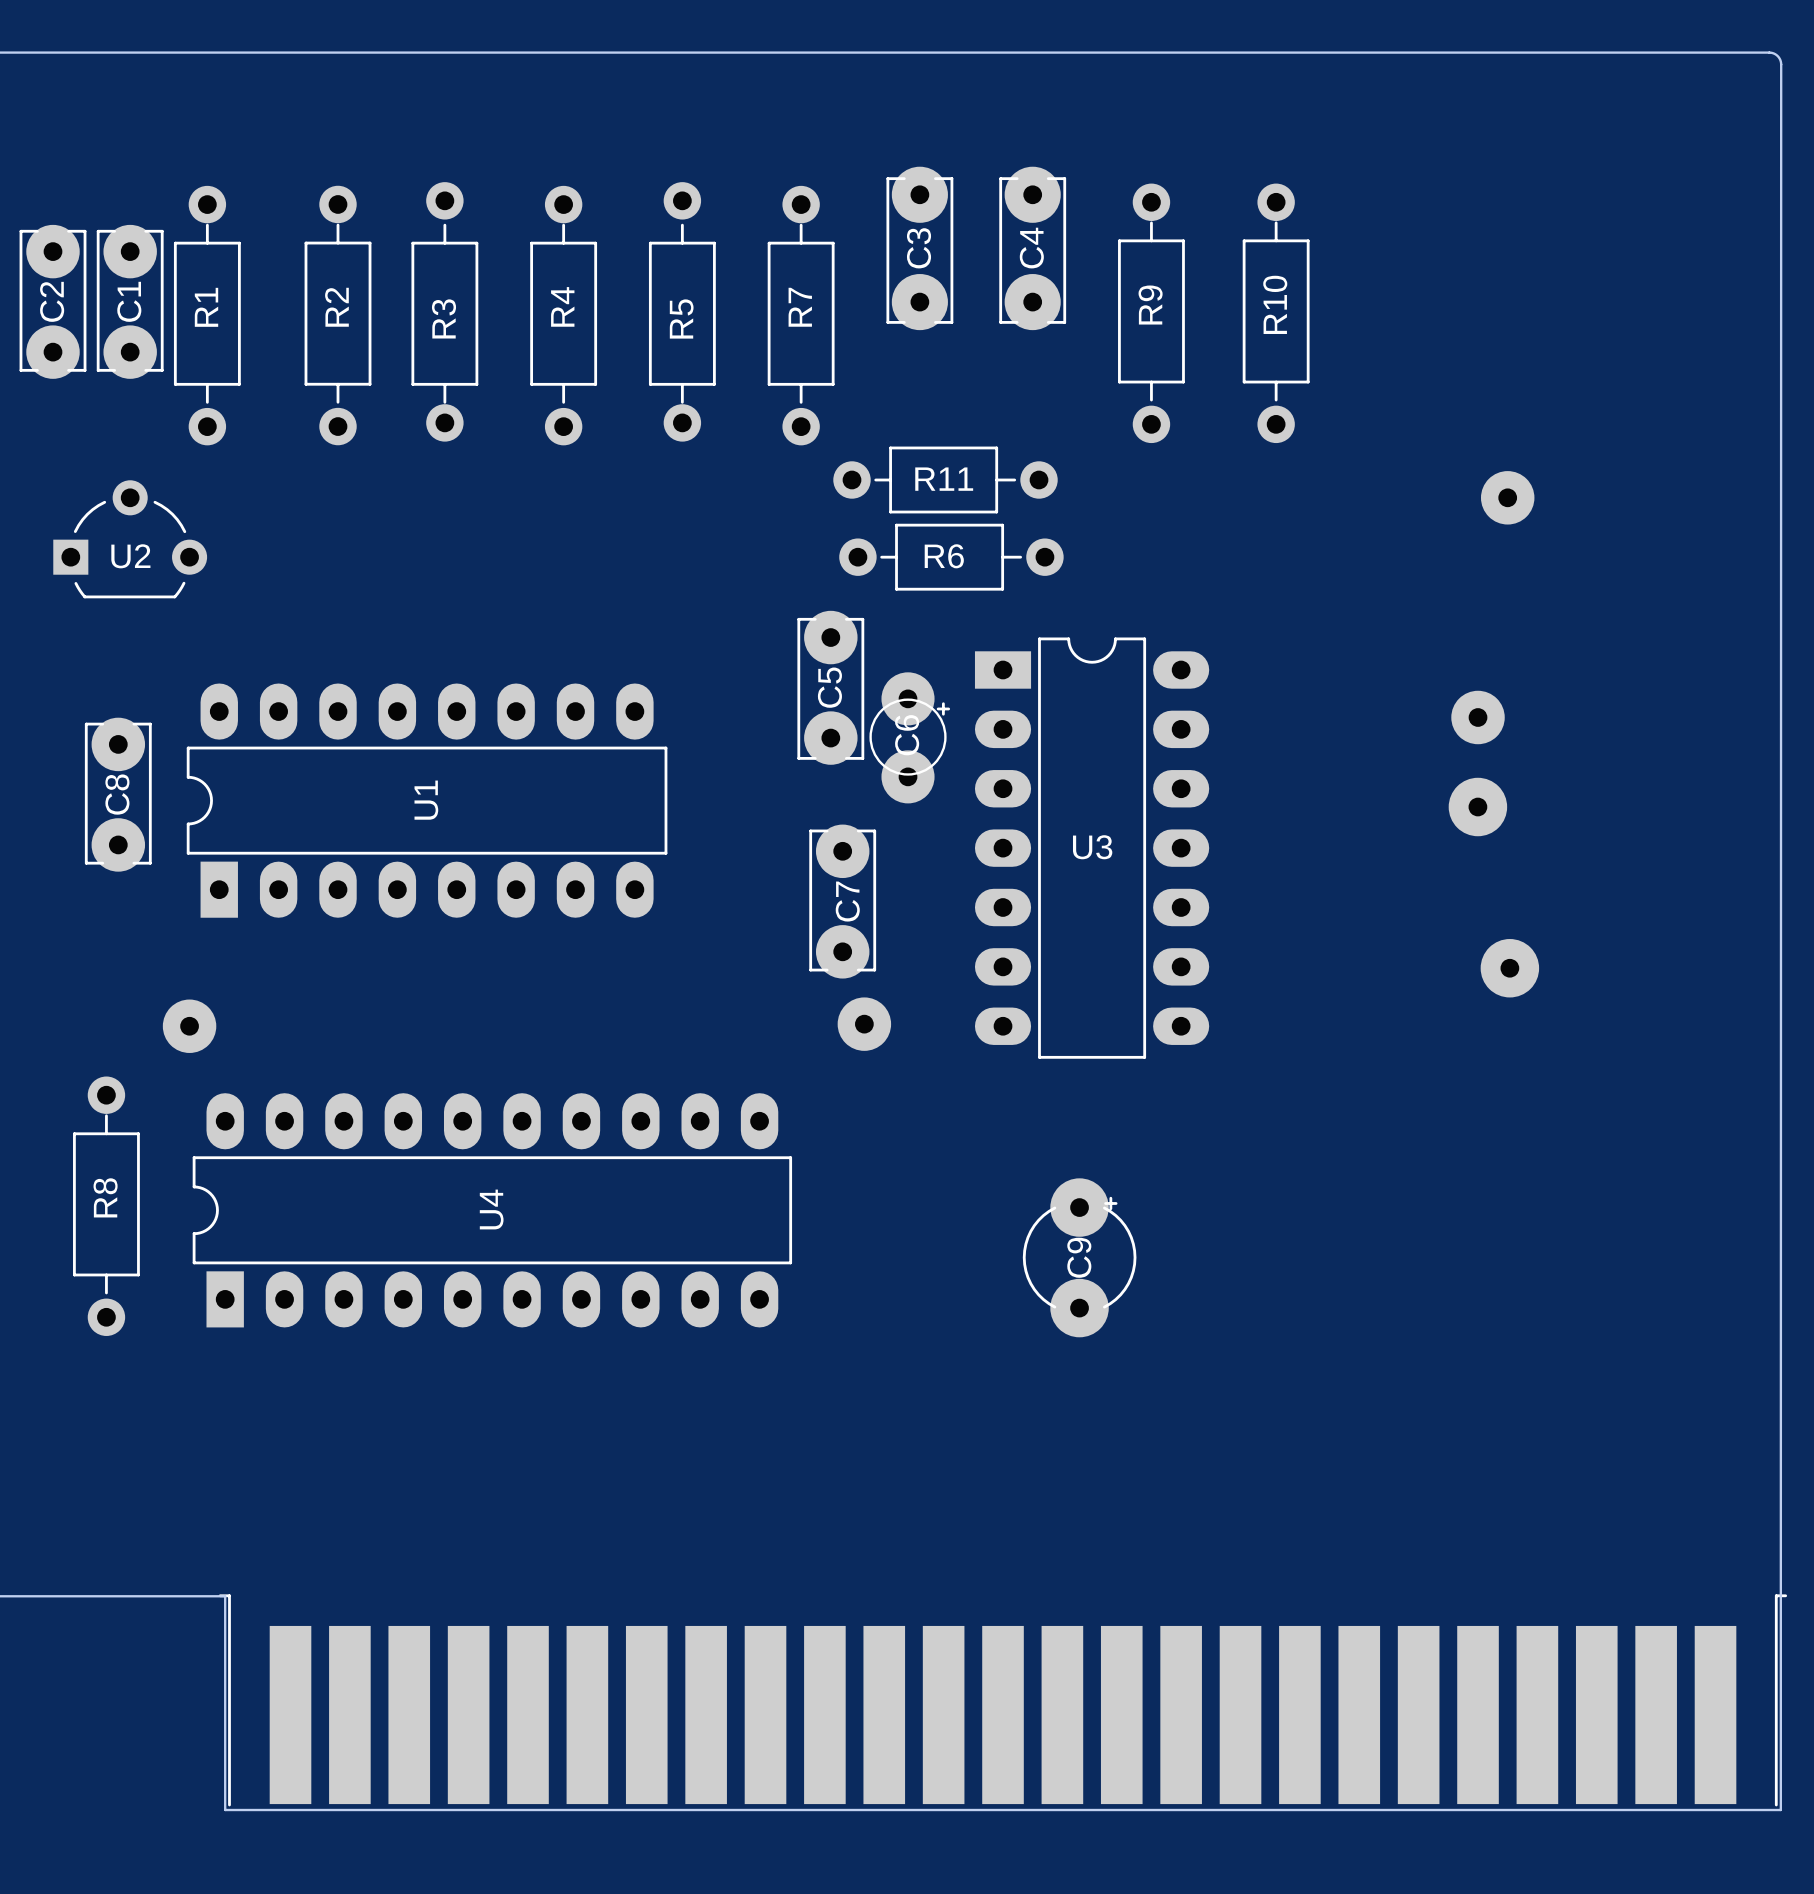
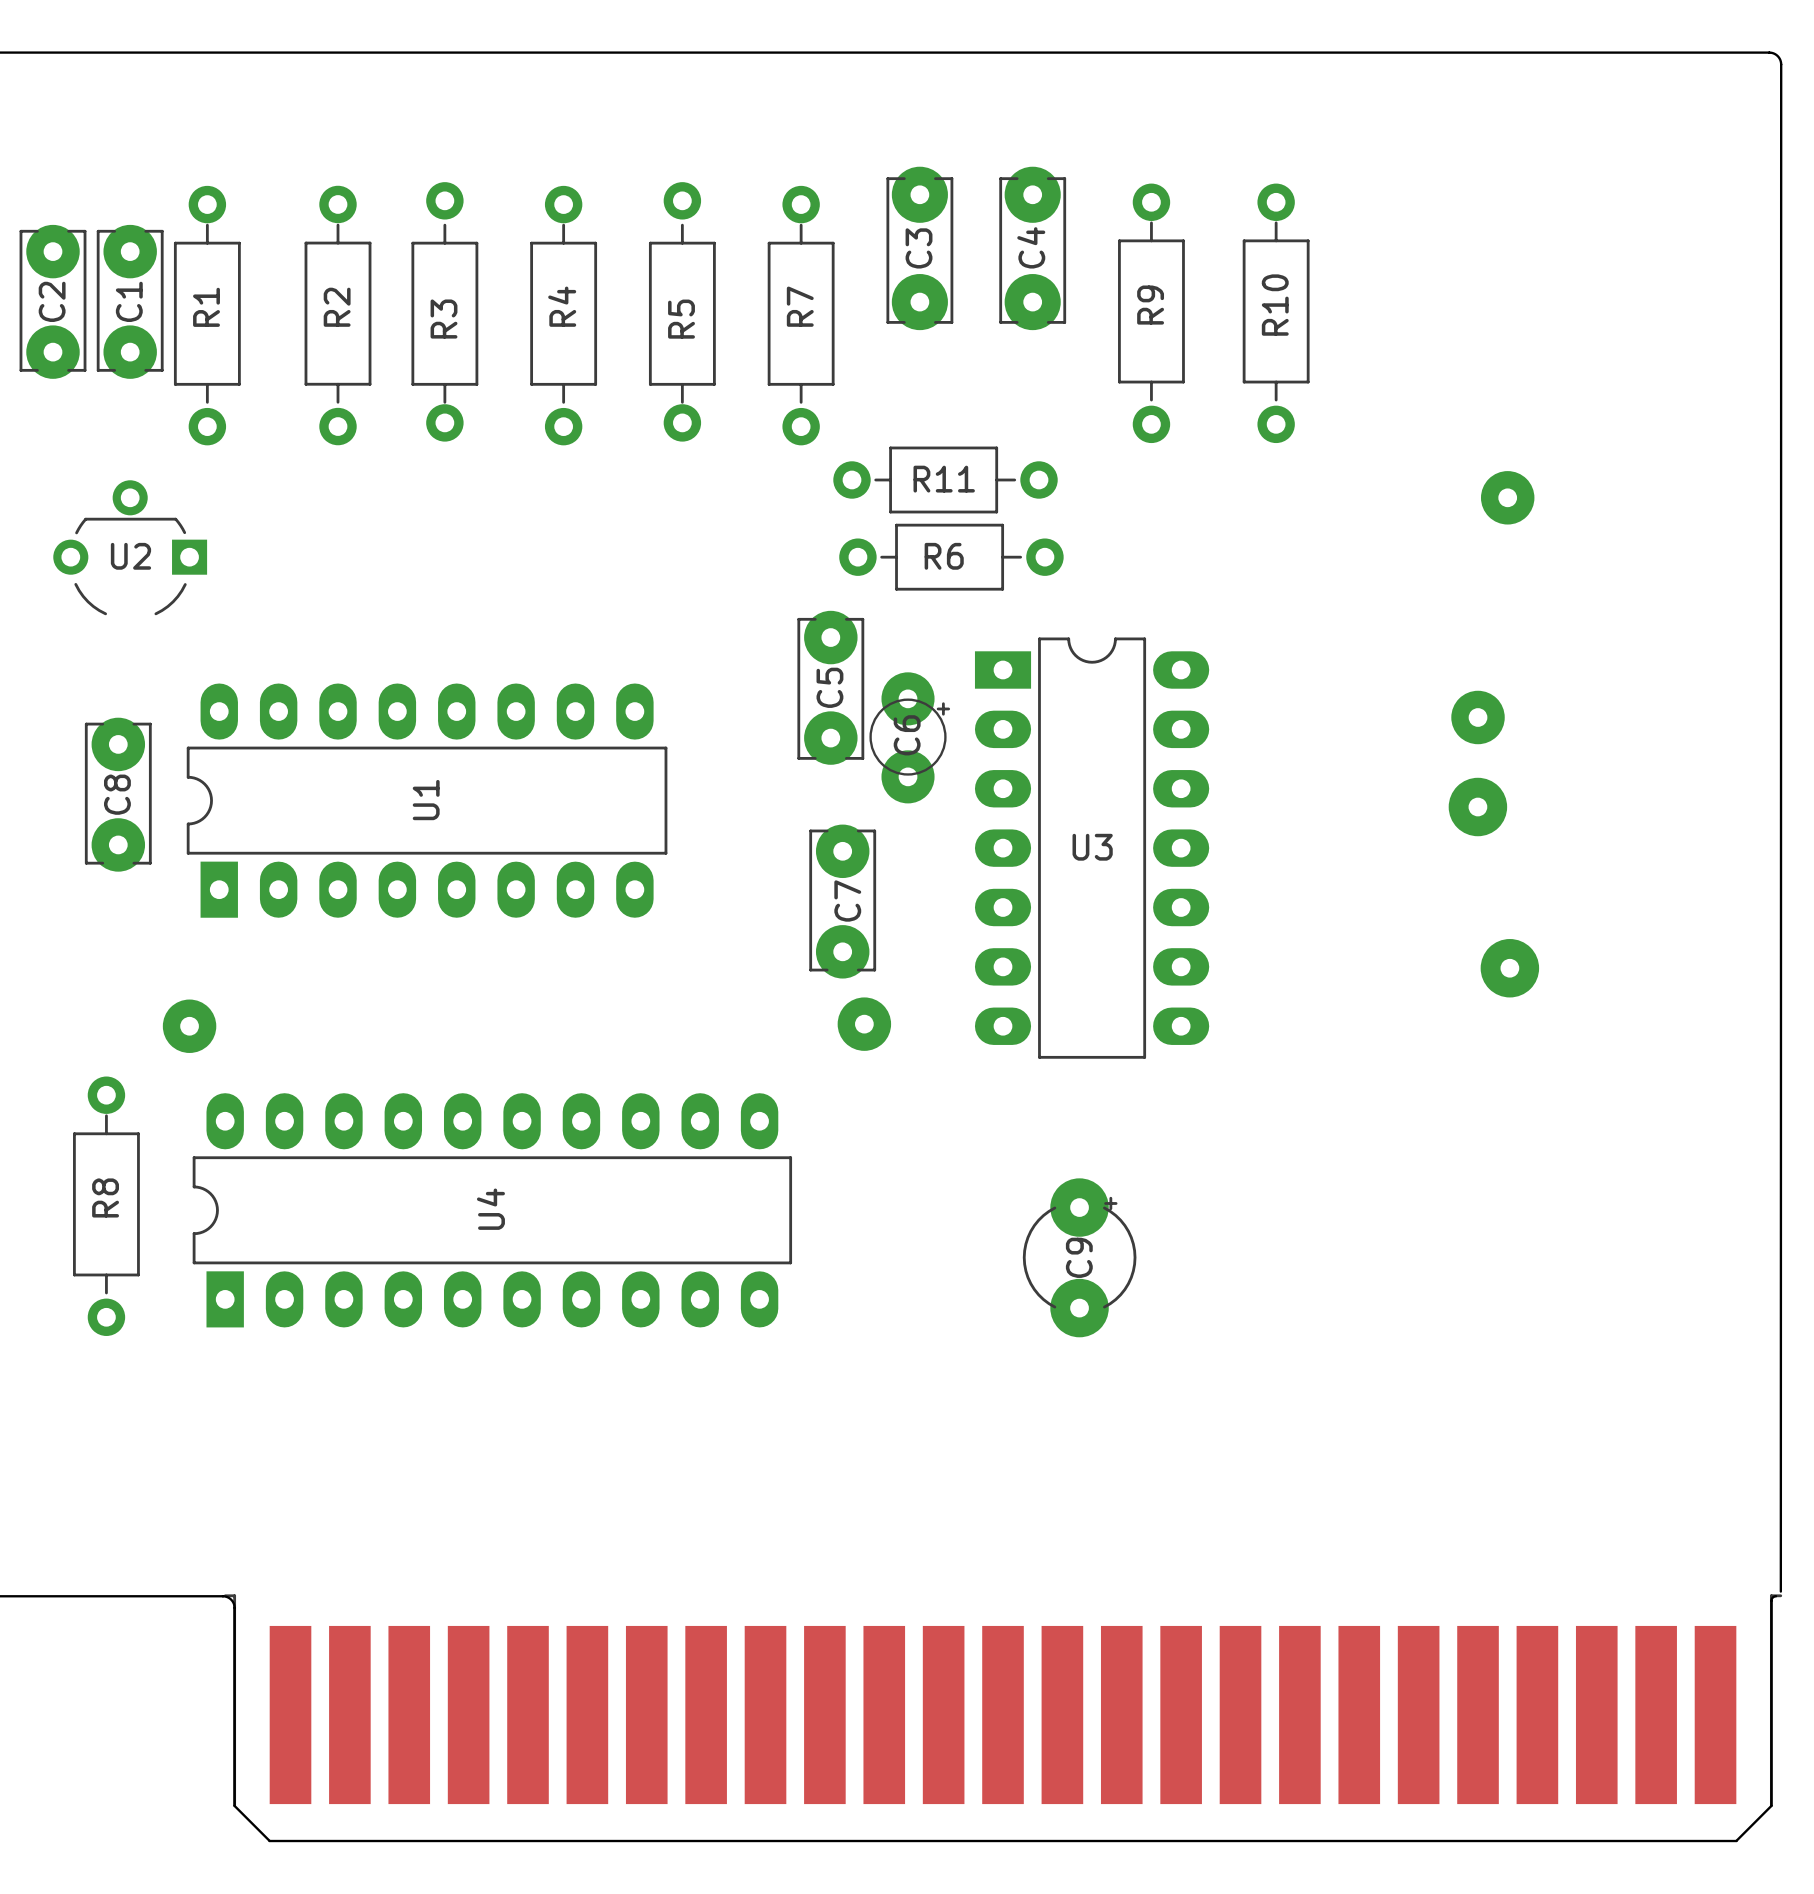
U2 footprint: [53, 480, 208, 599] -> [53, 480, 208, 616]
board edge: (1780, 1591) (1780, 1810) (225, 1810) (225, 1596) (222, 1596) -> (1776, 1596) (1771, 1600) (1771, 1805) (1736, 1841) (269, 1841) (234, 1805) (234, 1607) (231, 1599) (222, 1596)
part footprint: [218, 1594, 1788, 1807] -> [223, 1594, 1783, 1807]

